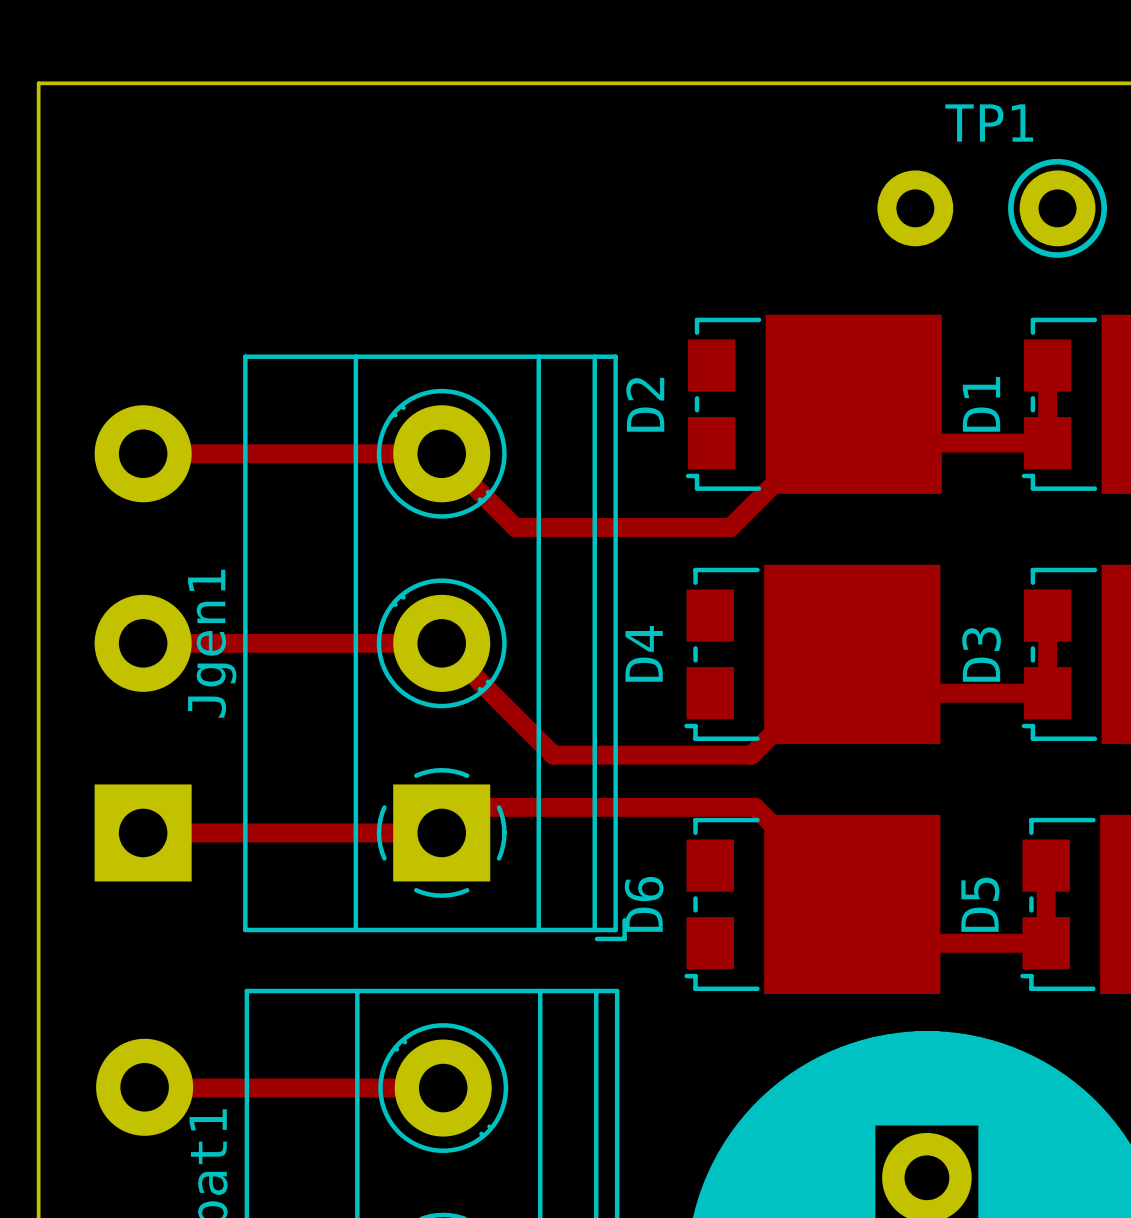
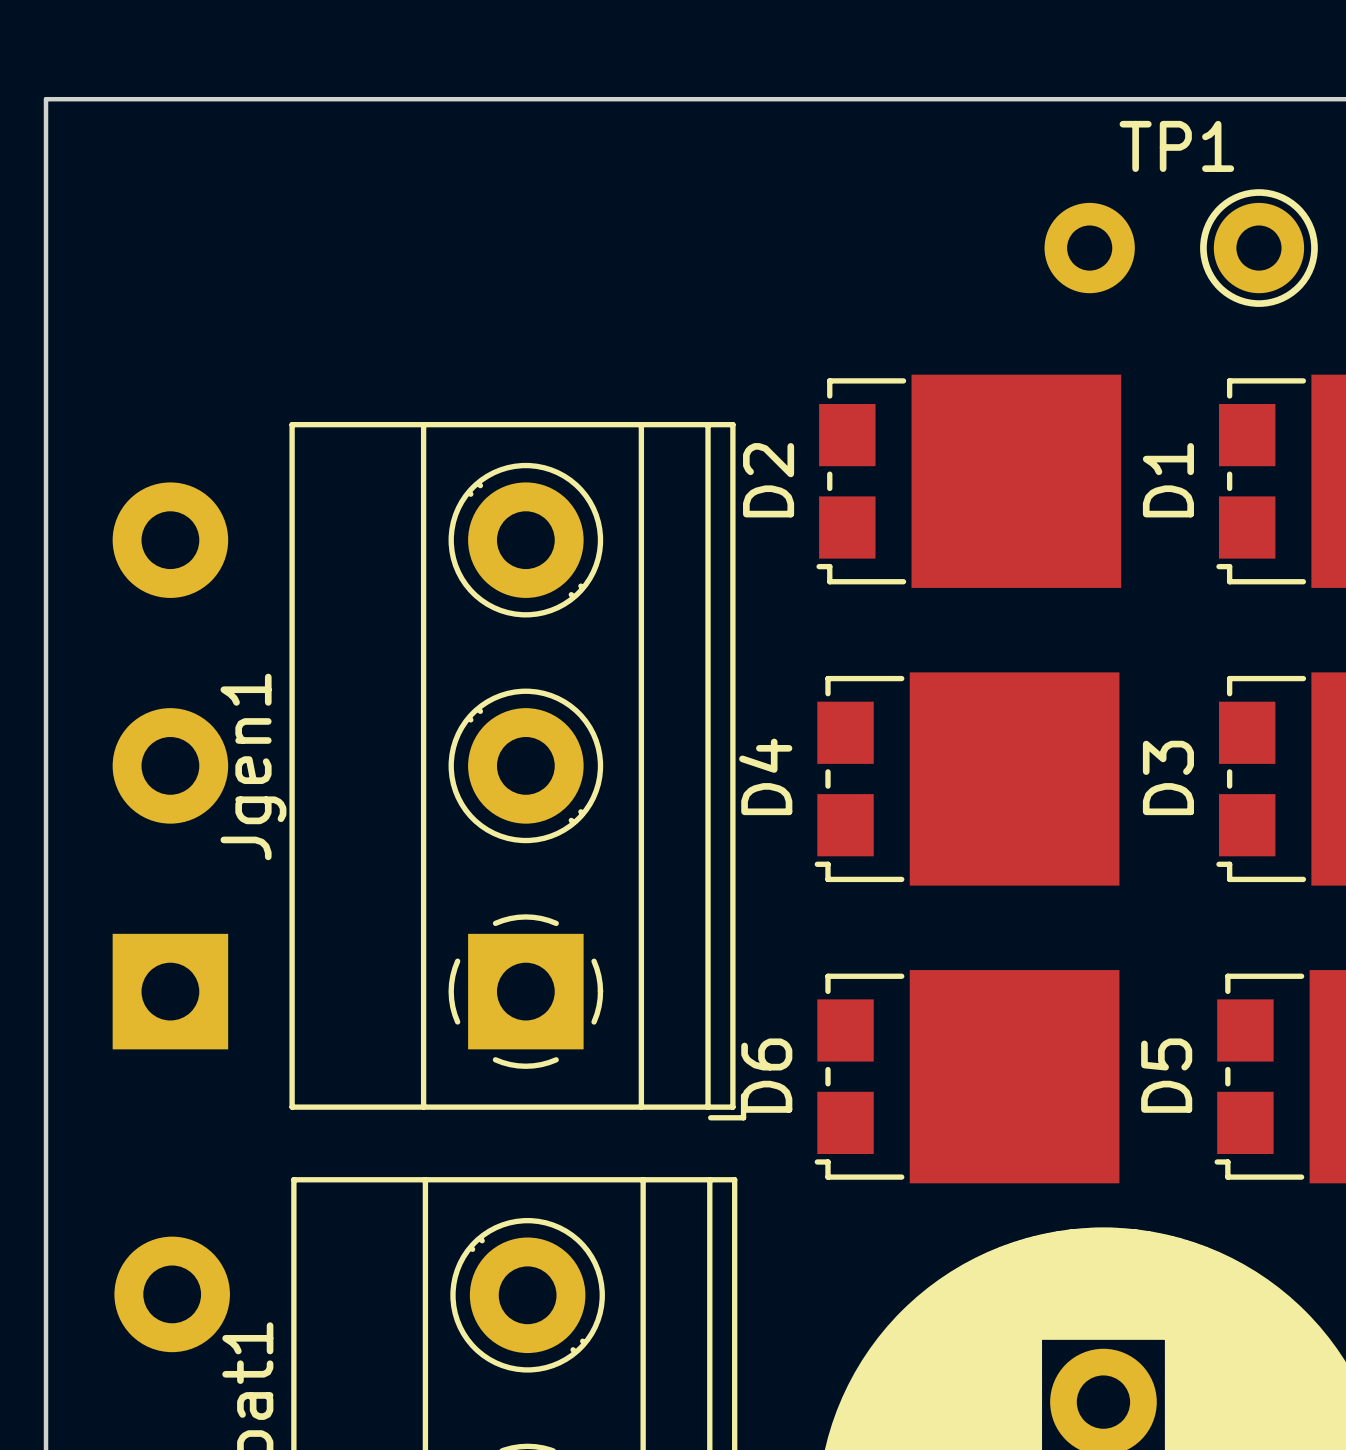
track: (1047, 365) (1047, 443) (892, 443) (853, 404) (730, 527) (515, 527) (441, 453) (143, 453) -> none
track: (1047, 615) (1047, 693) (891, 693) (852, 654) (751, 755) (553, 755) (441, 643) (143, 643) -> none
track: (143, 832) (441, 832) (467, 807) (755, 807) (891, 943) (1046, 943) (1046, 865) -> none
track: (144, 1087) (443, 1088) -> none

